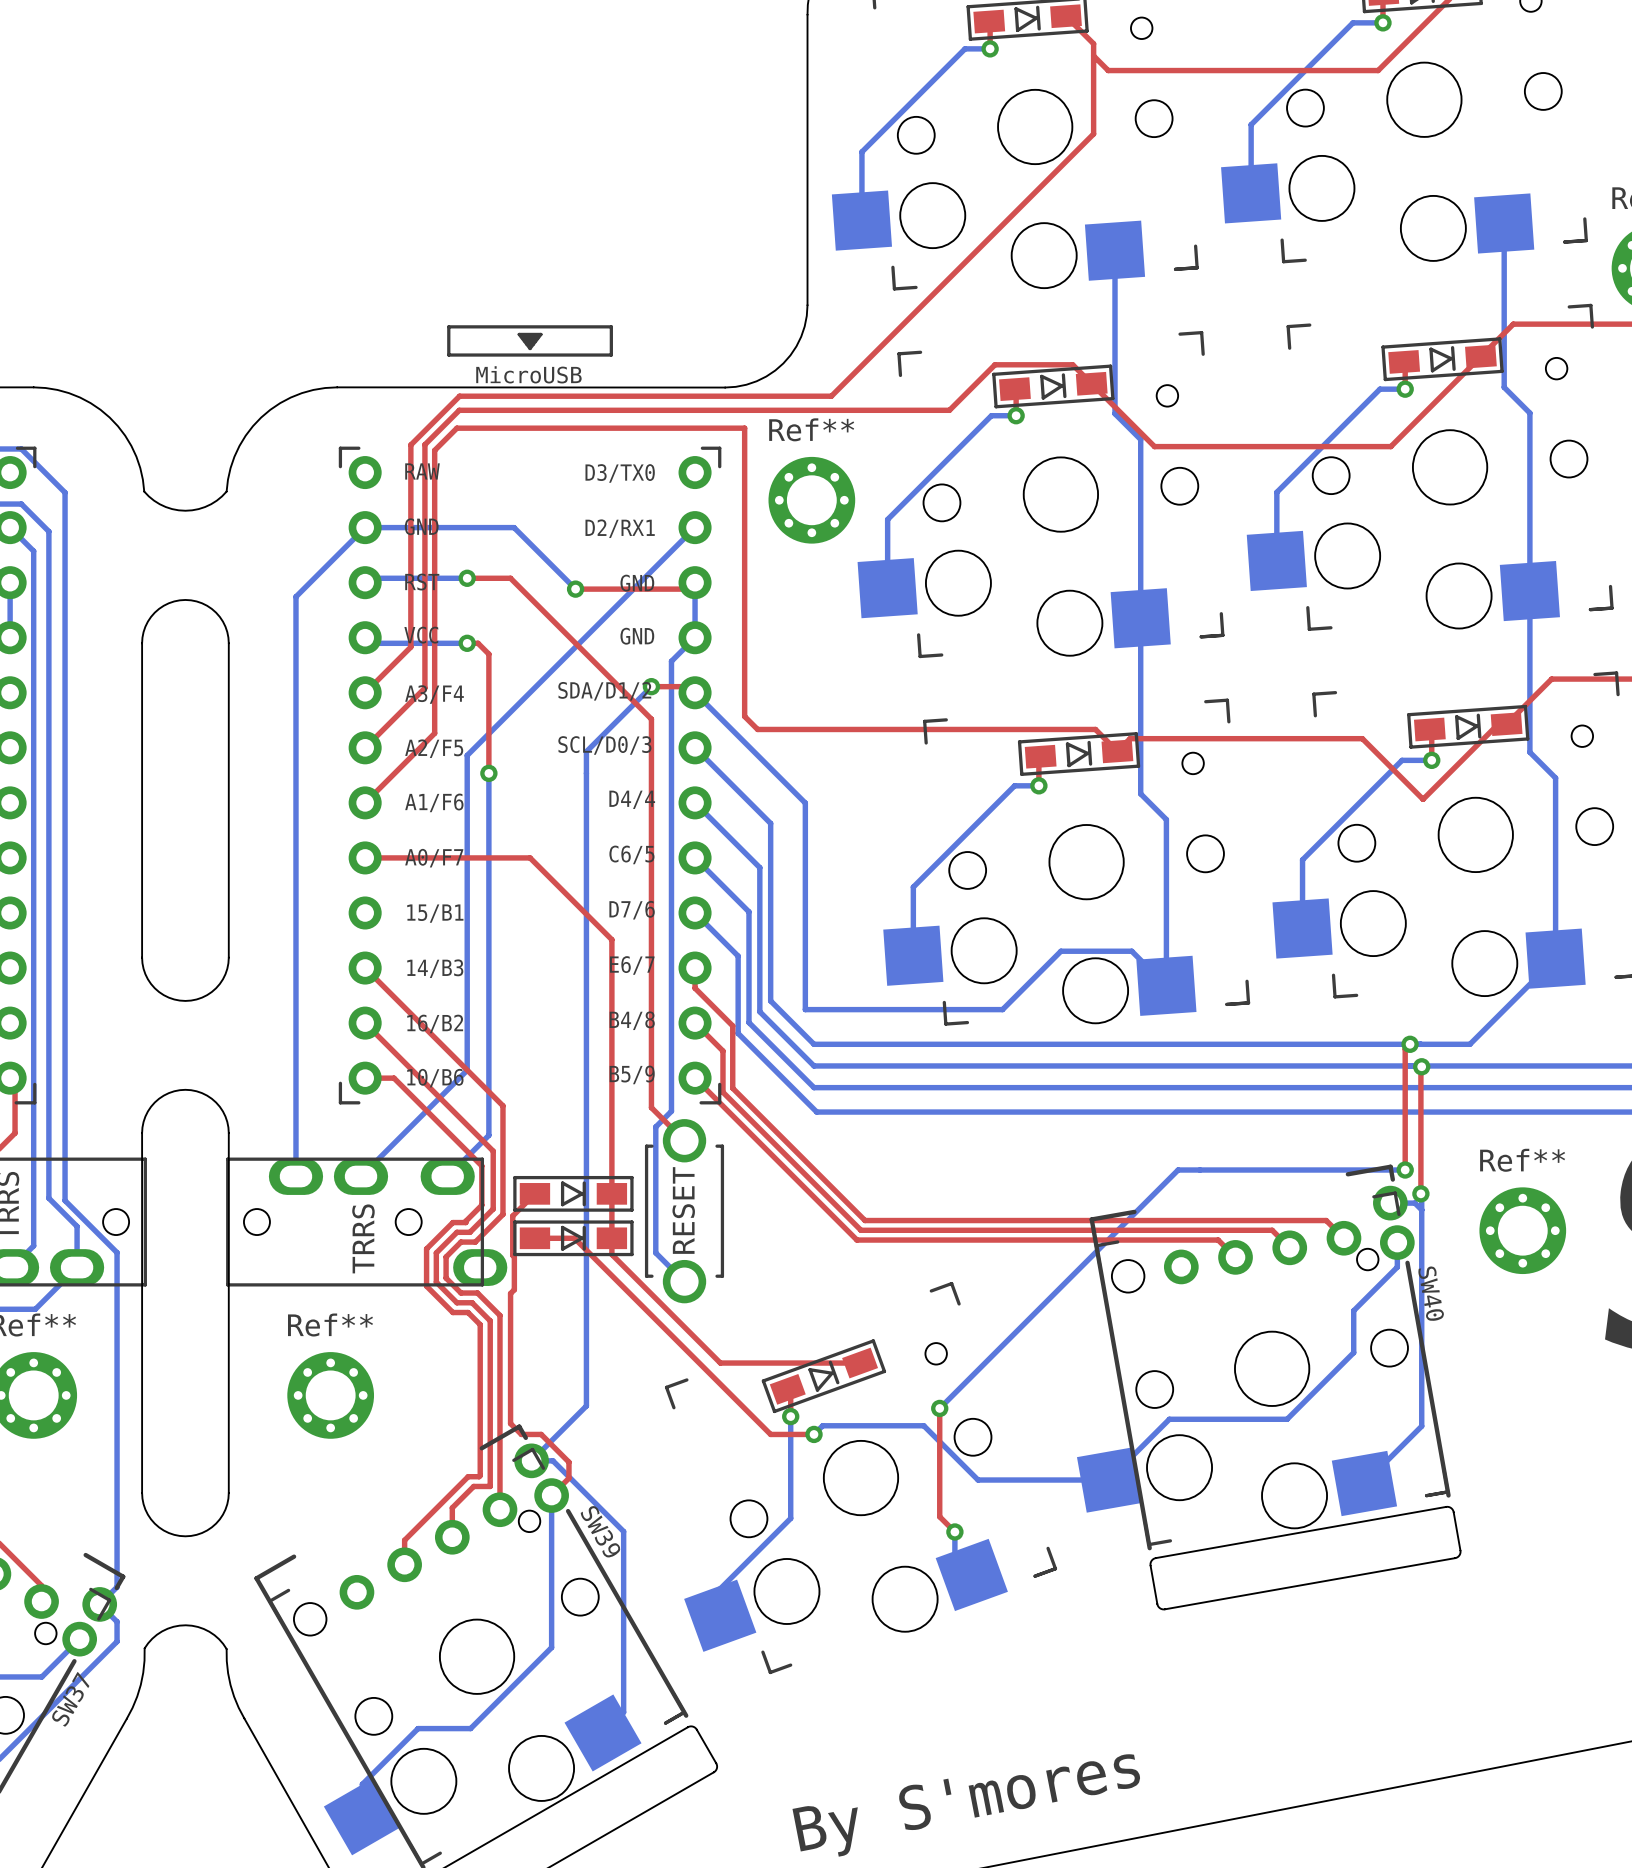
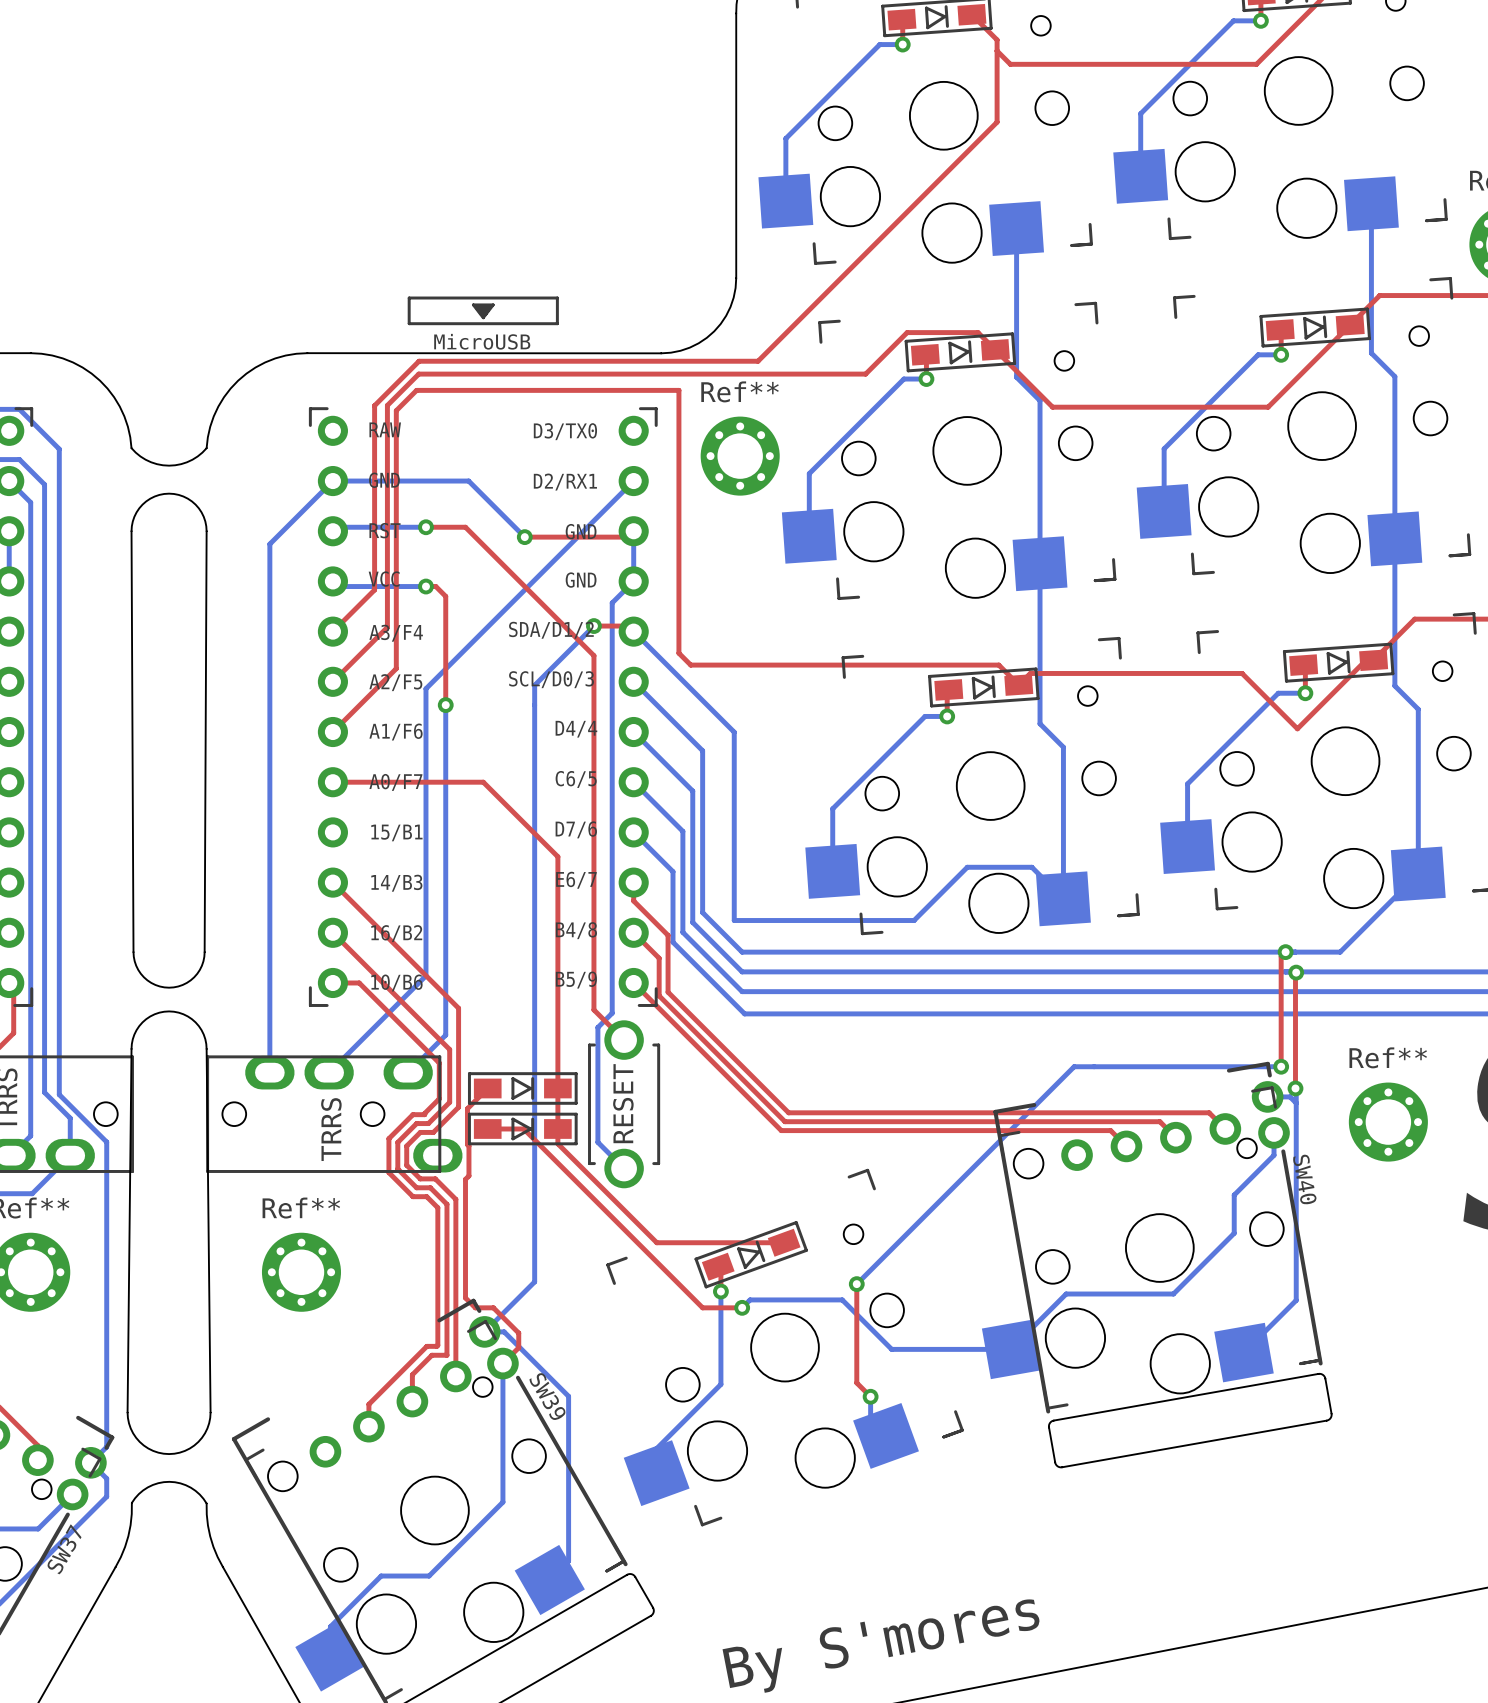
board edge: (142, 643) (142, 963) (147, 979) (159, 991) (174, 999) (191, 1000) (207, 995) (216, 988) (222, 979) (228, 963) (228, 637) (222, 621) (211, 608) (196, 601) (179, 600) (163, 605) (151, 616) (145, 626) (142, 643) -> (131, 531) (134, 516) (142, 504) (154, 496) (169, 493) (183, 496) (195, 504) (203, 516) (206, 526) (204, 956) (201, 965) (194, 977) (182, 984) (173, 987) (159, 986) (147, 980) (138, 969) (133, 956) (131, 531)
board edge: (142, 1133) (142, 1498) (147, 1514) (159, 1527) (174, 1534) (191, 1535) (207, 1530) (216, 1523) (222, 1514) (228, 1498) (228, 1127) (222, 1111) (211, 1098) (196, 1091) (179, 1090) (163, 1095) (151, 1106) (145, 1116) (142, 1133) -> (131, 1048) (127, 1417) (133, 1433) (143, 1445) (158, 1452) (174, 1453) (189, 1448) (198, 1441) (205, 1433) (210, 1417) (206, 1044) (203, 1034) (195, 1022) (183, 1014) (169, 1011) (154, 1014) (142, 1022) (134, 1034) (131, 1048)

